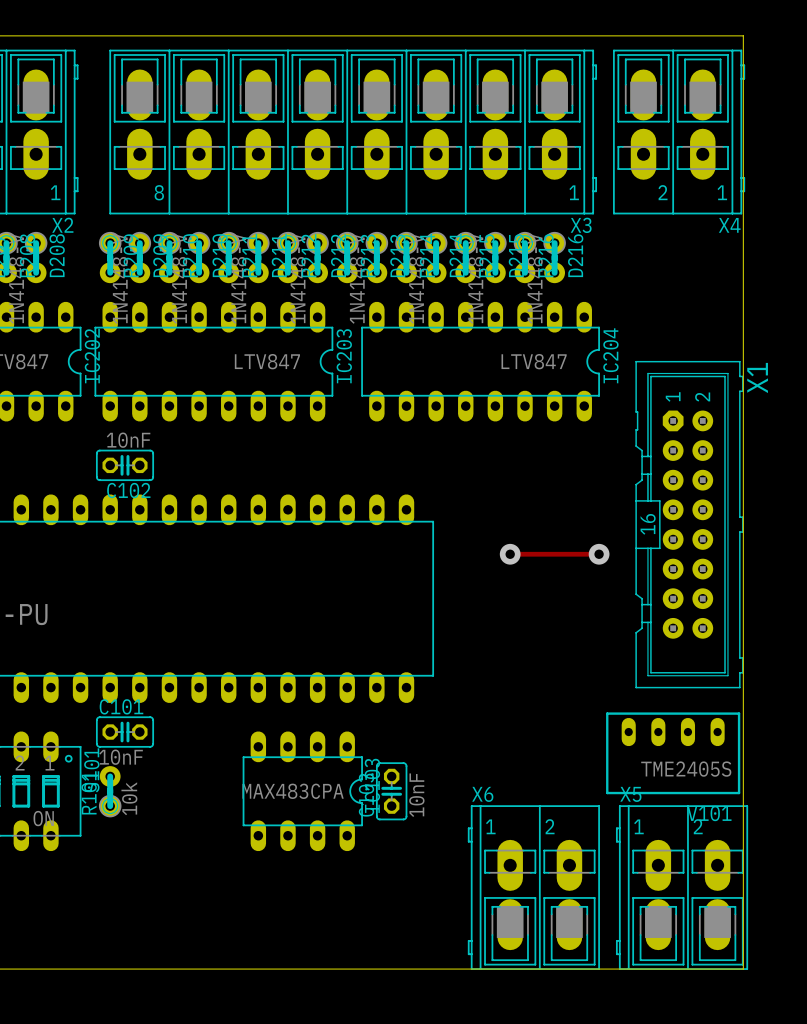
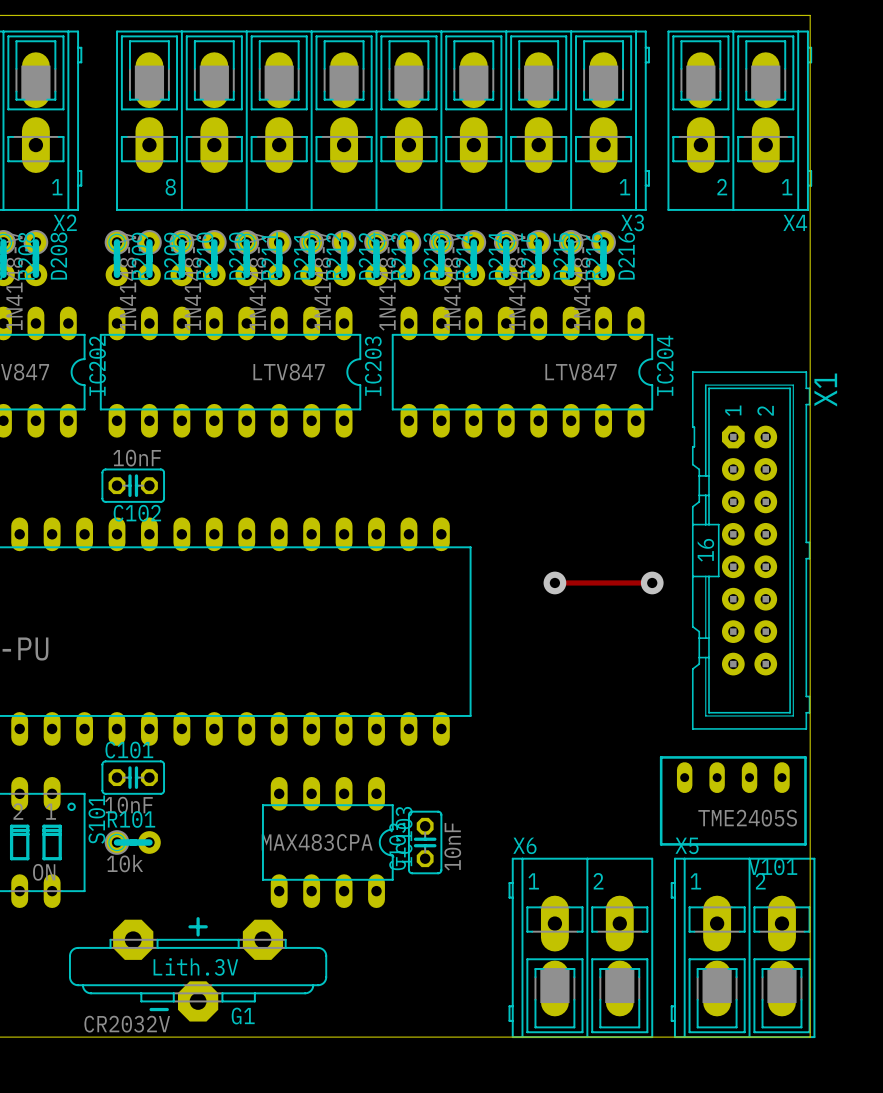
R101 rotation: 0° (110, 791) -> 90° clockwise (132, 842)
G1: none -> CR2032V (198, 969)

